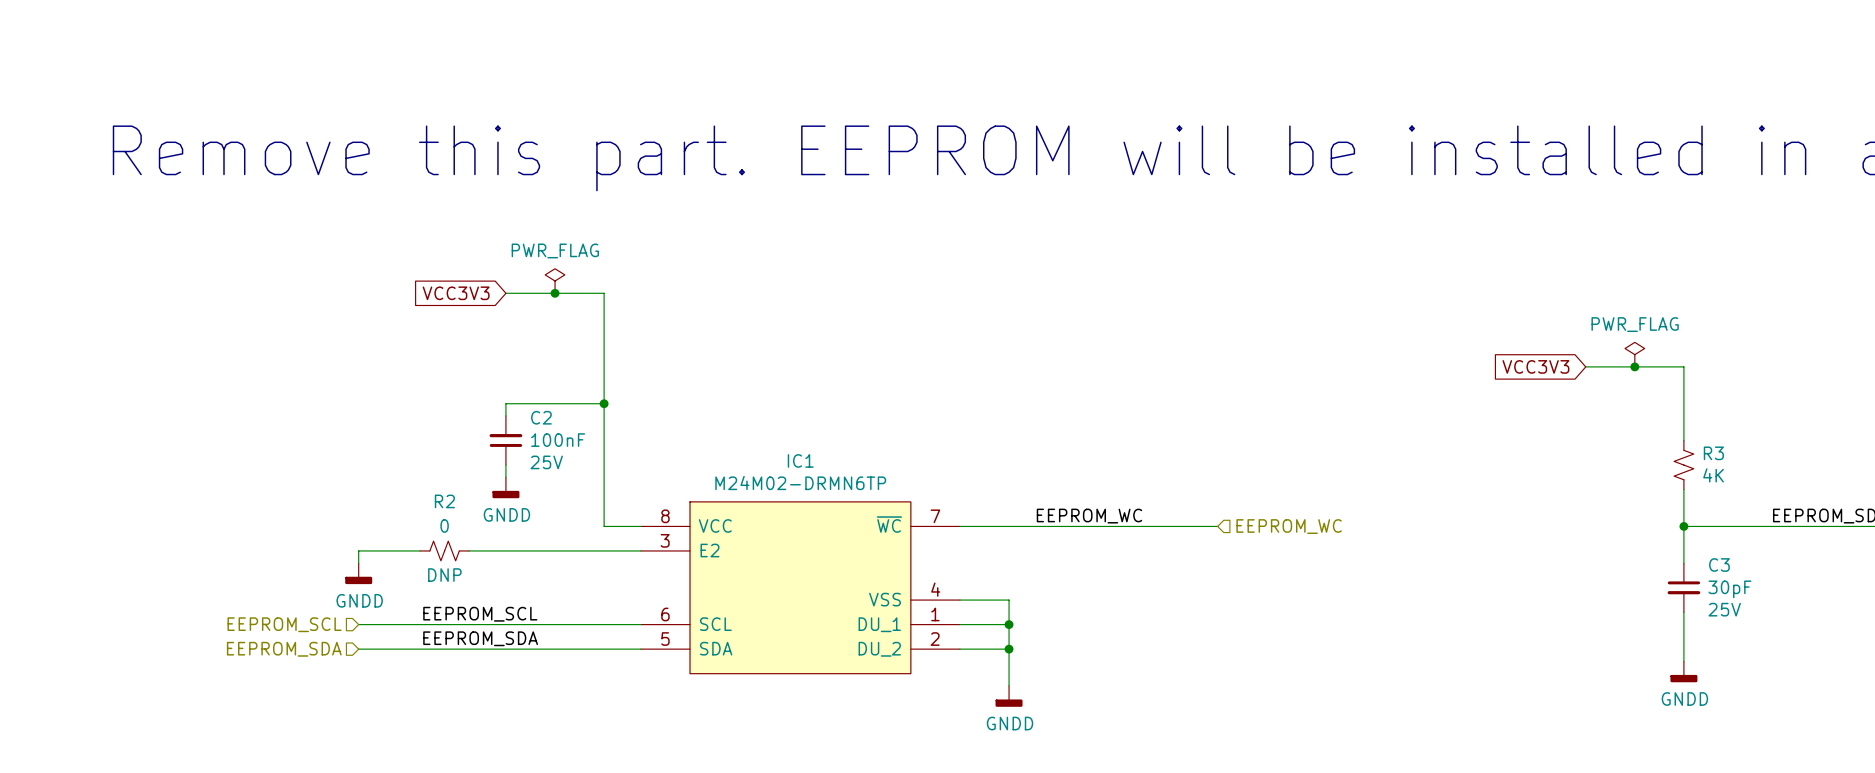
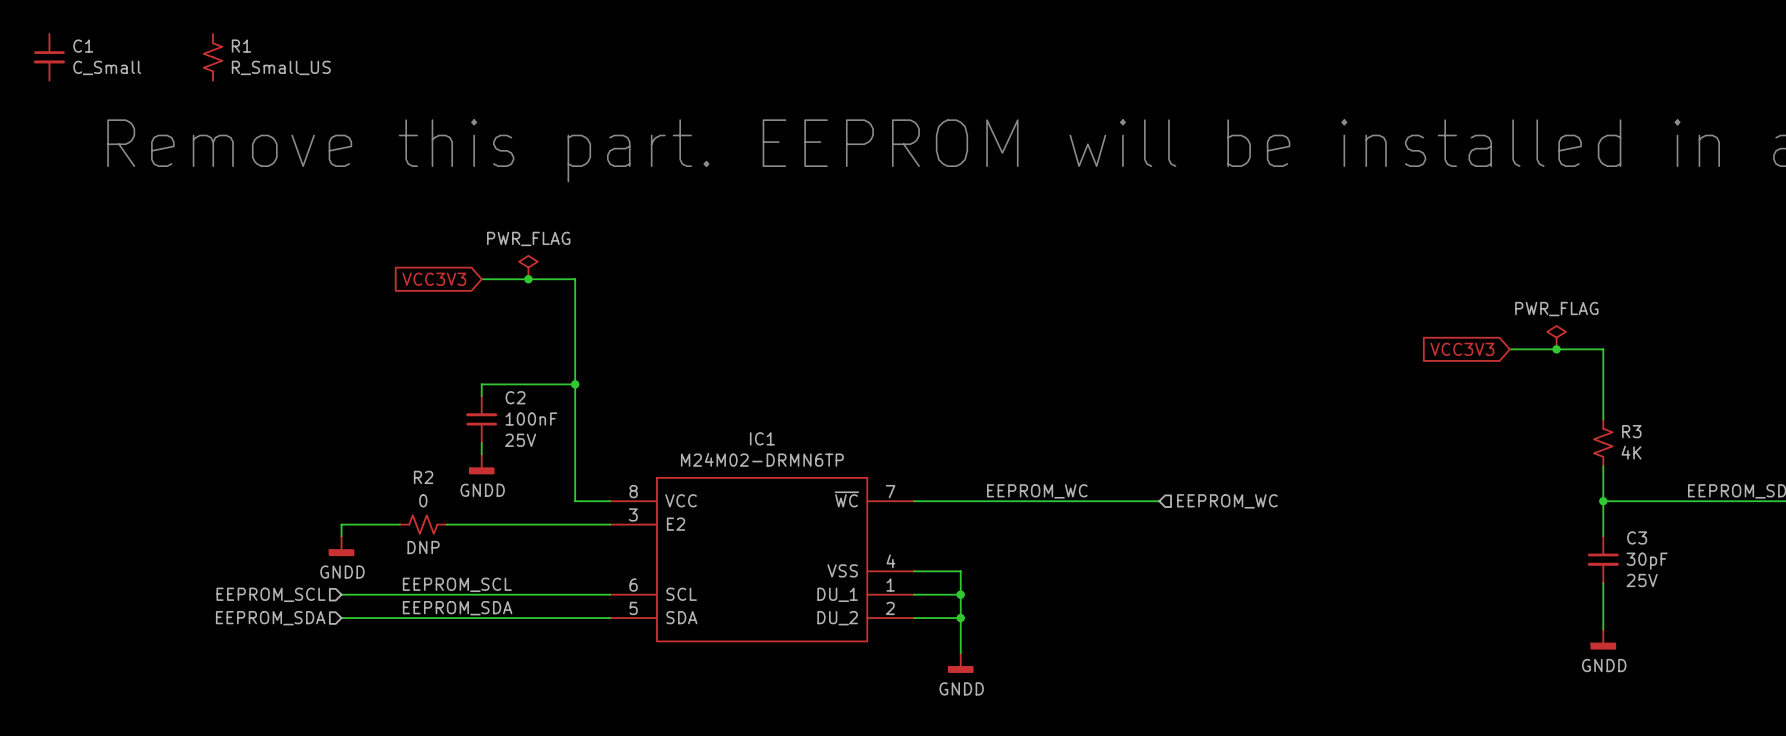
C1: none -> C_Small (49, 57)
R1: none -> R_Small_US (213, 57)

